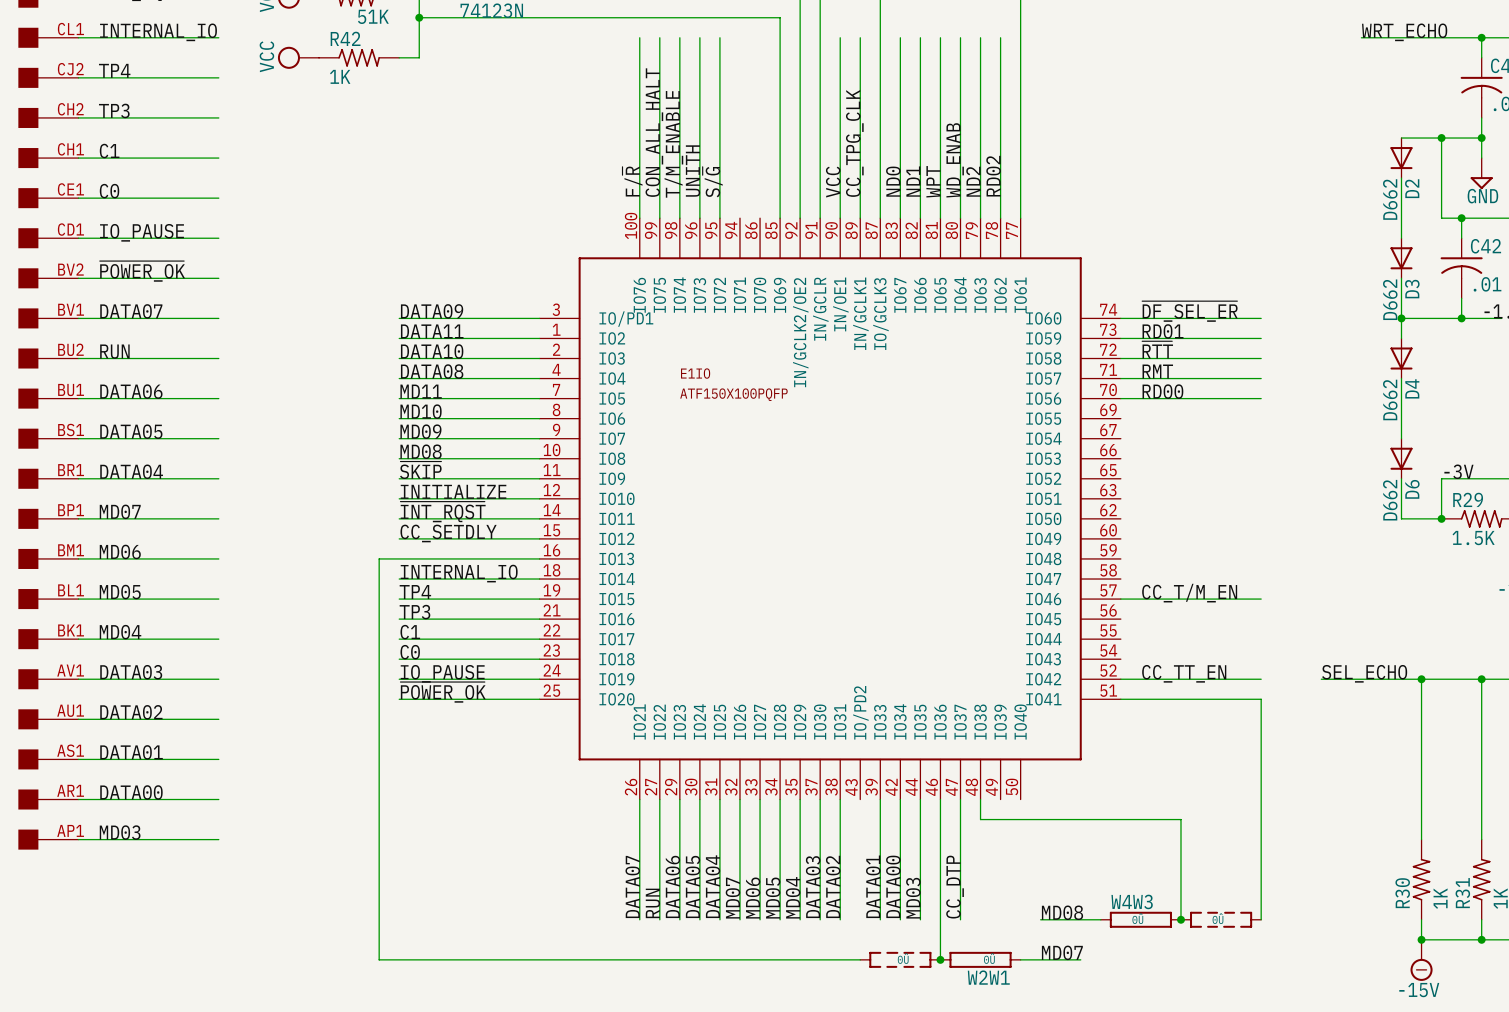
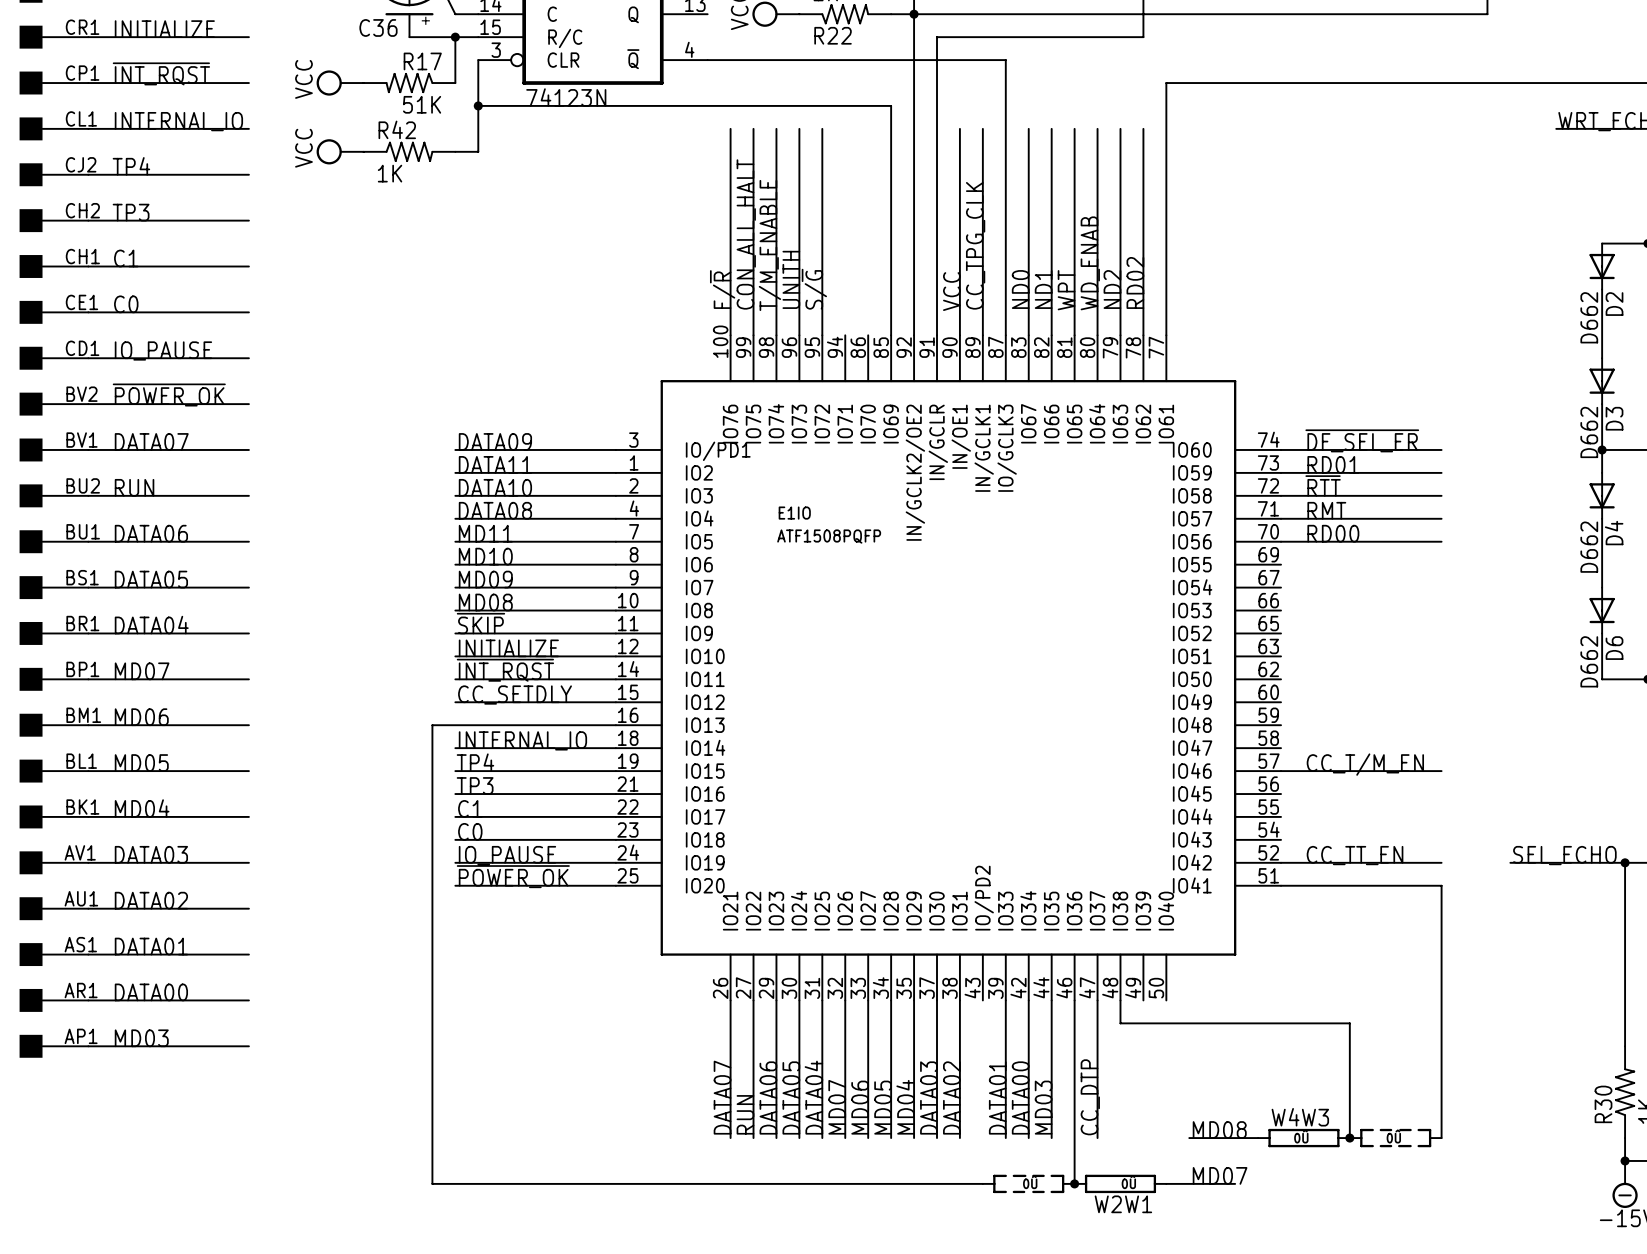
E1IO value: ATF150X100PQFP (733, 394) -> ATF1508PQFP (829, 536)

